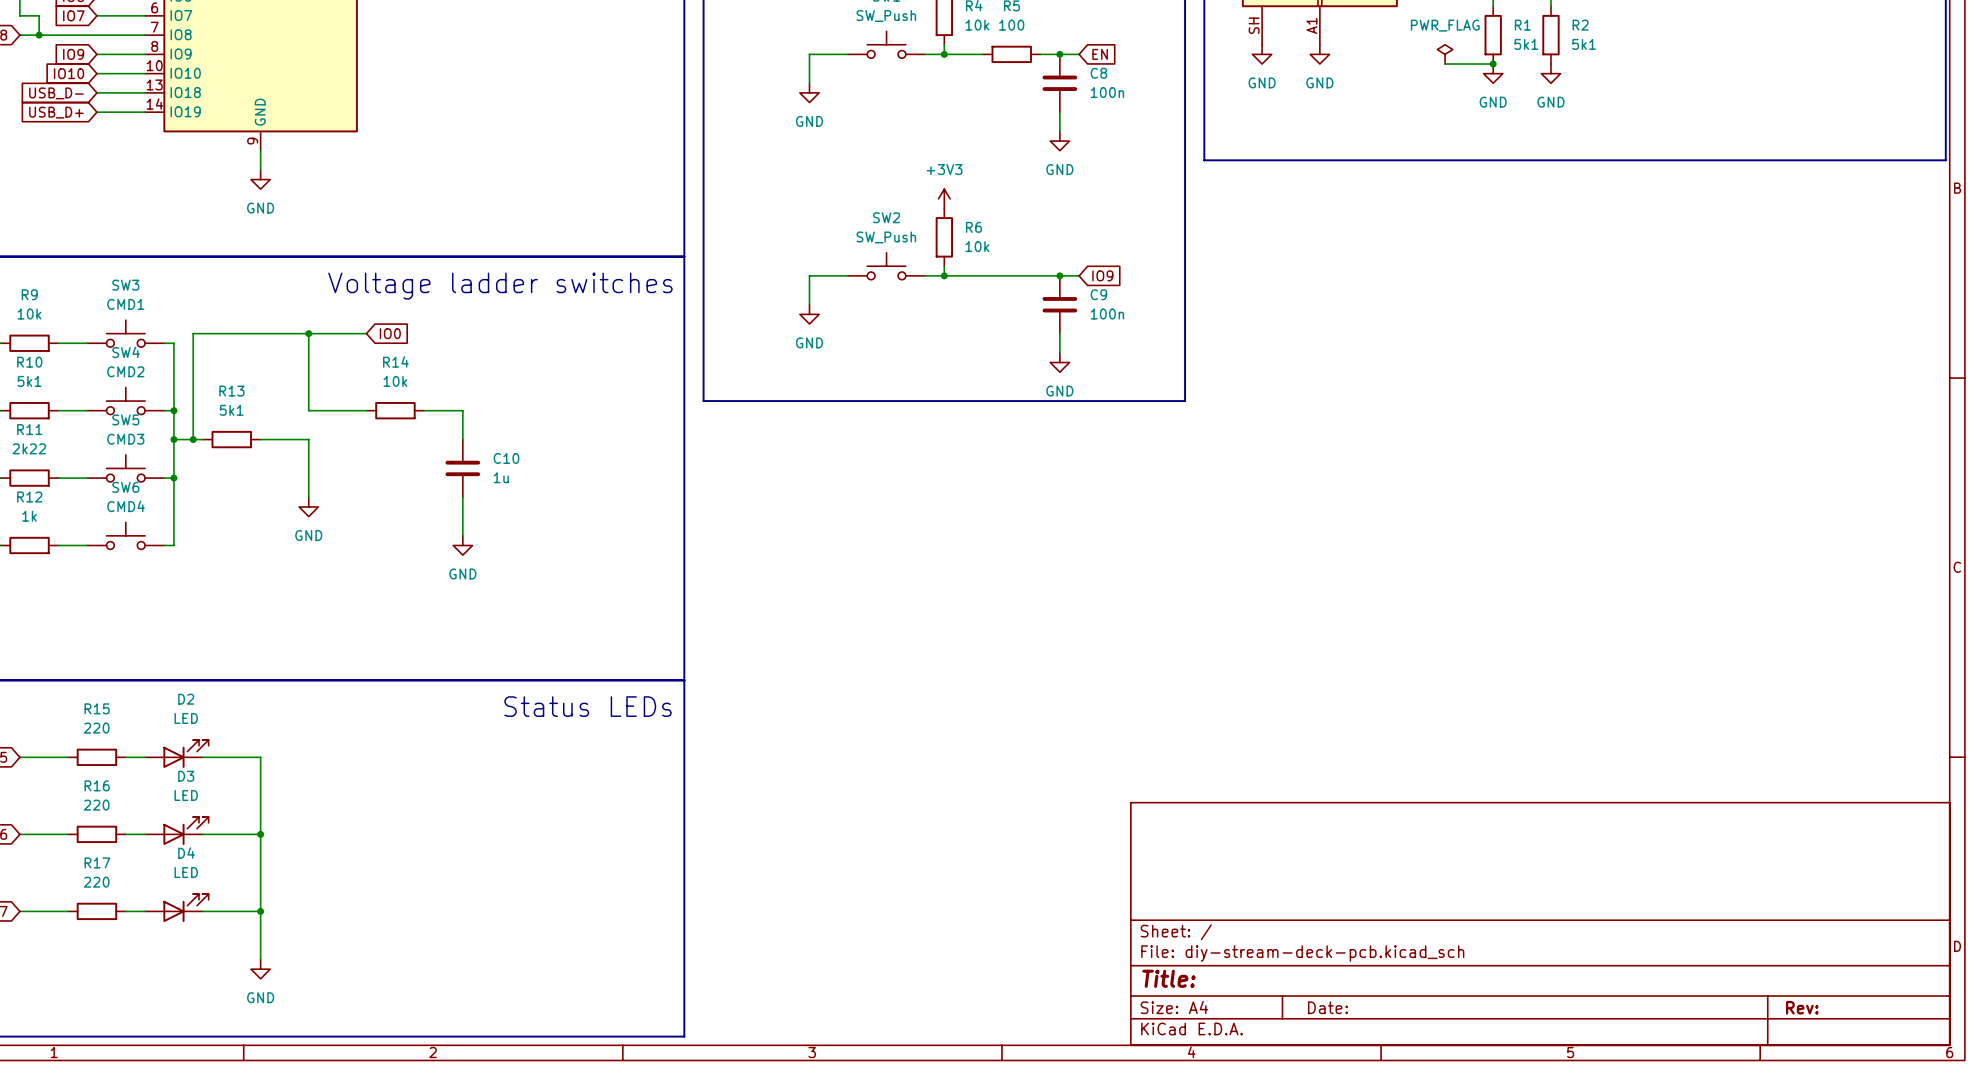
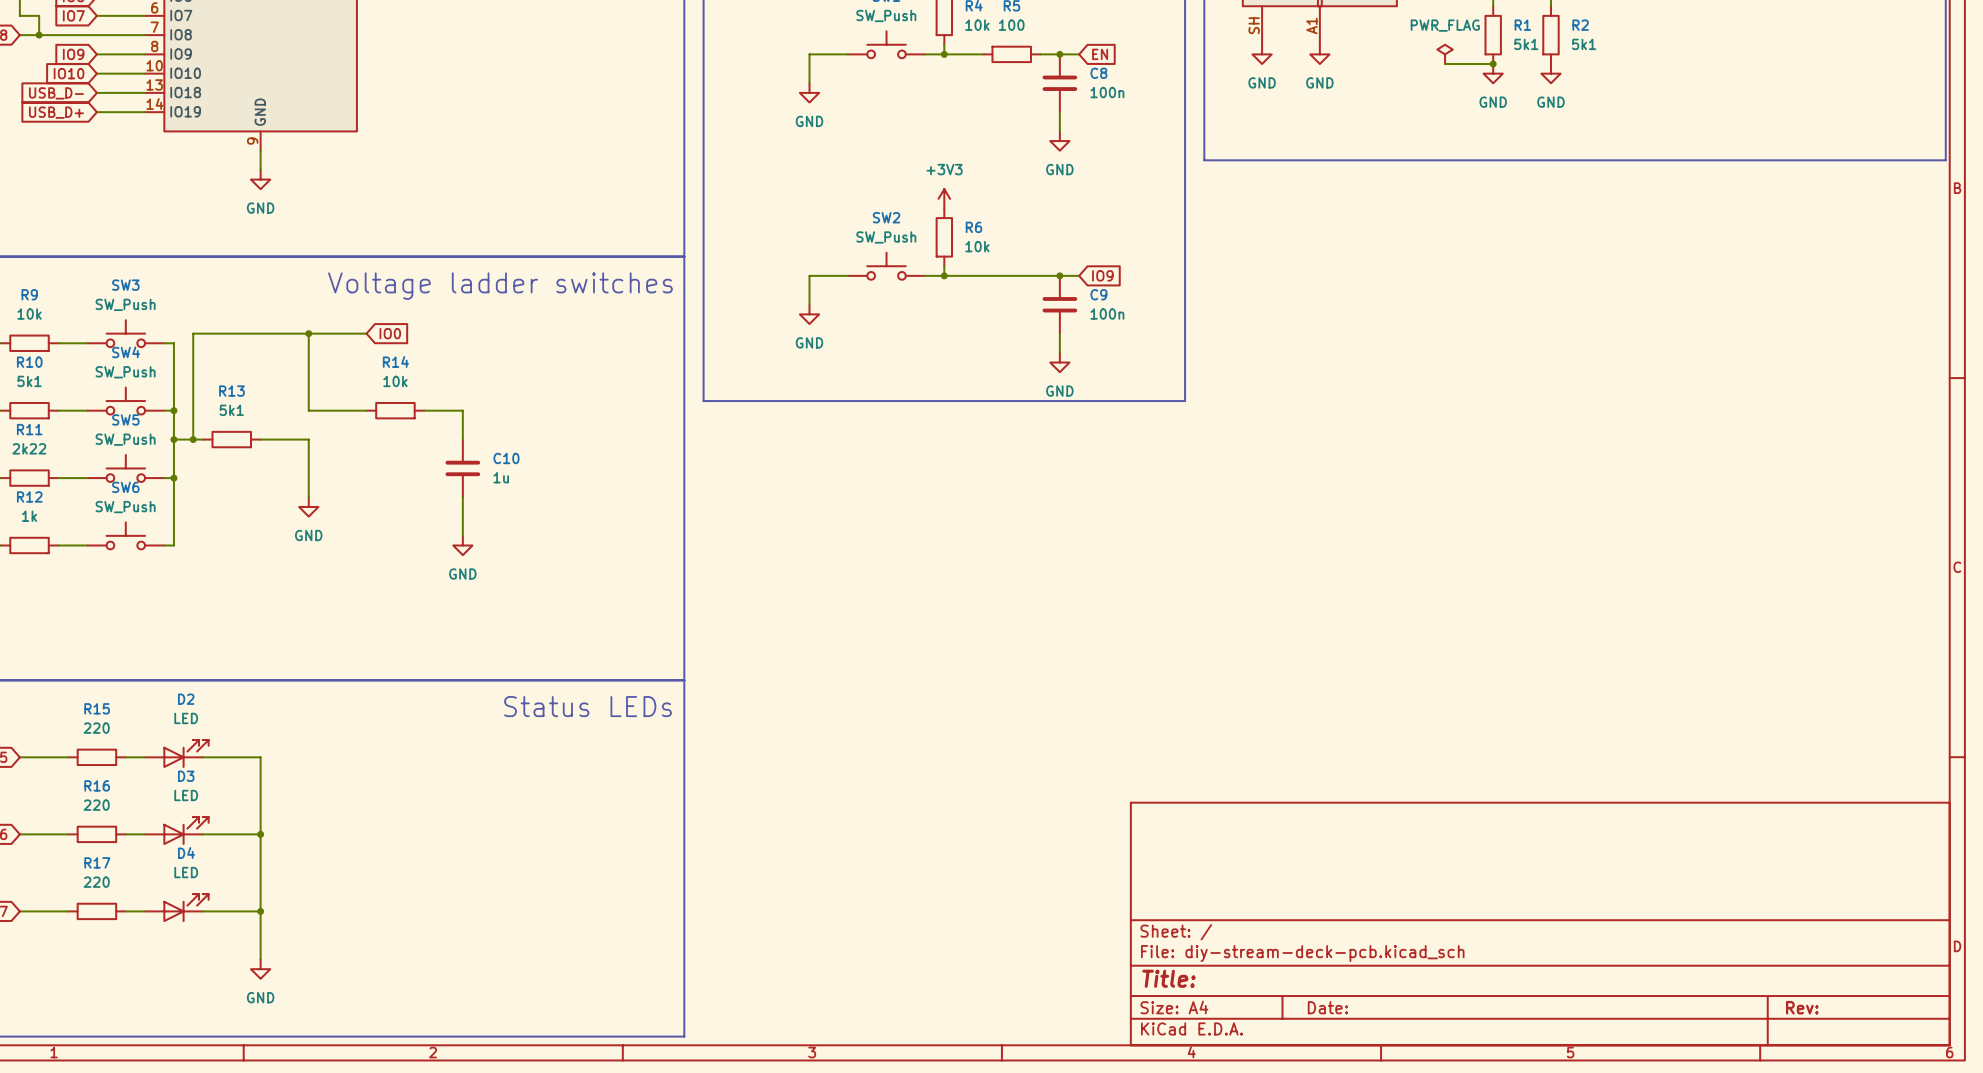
SW3 value: CMD1 (125, 304) -> SW_Push (125, 304)
SW4 value: CMD2 (125, 371) -> SW_Push (125, 372)
SW5 value: CMD3 (125, 439) -> SW_Push (125, 439)
SW6 value: CMD4 (126, 506) -> SW_Push (125, 507)

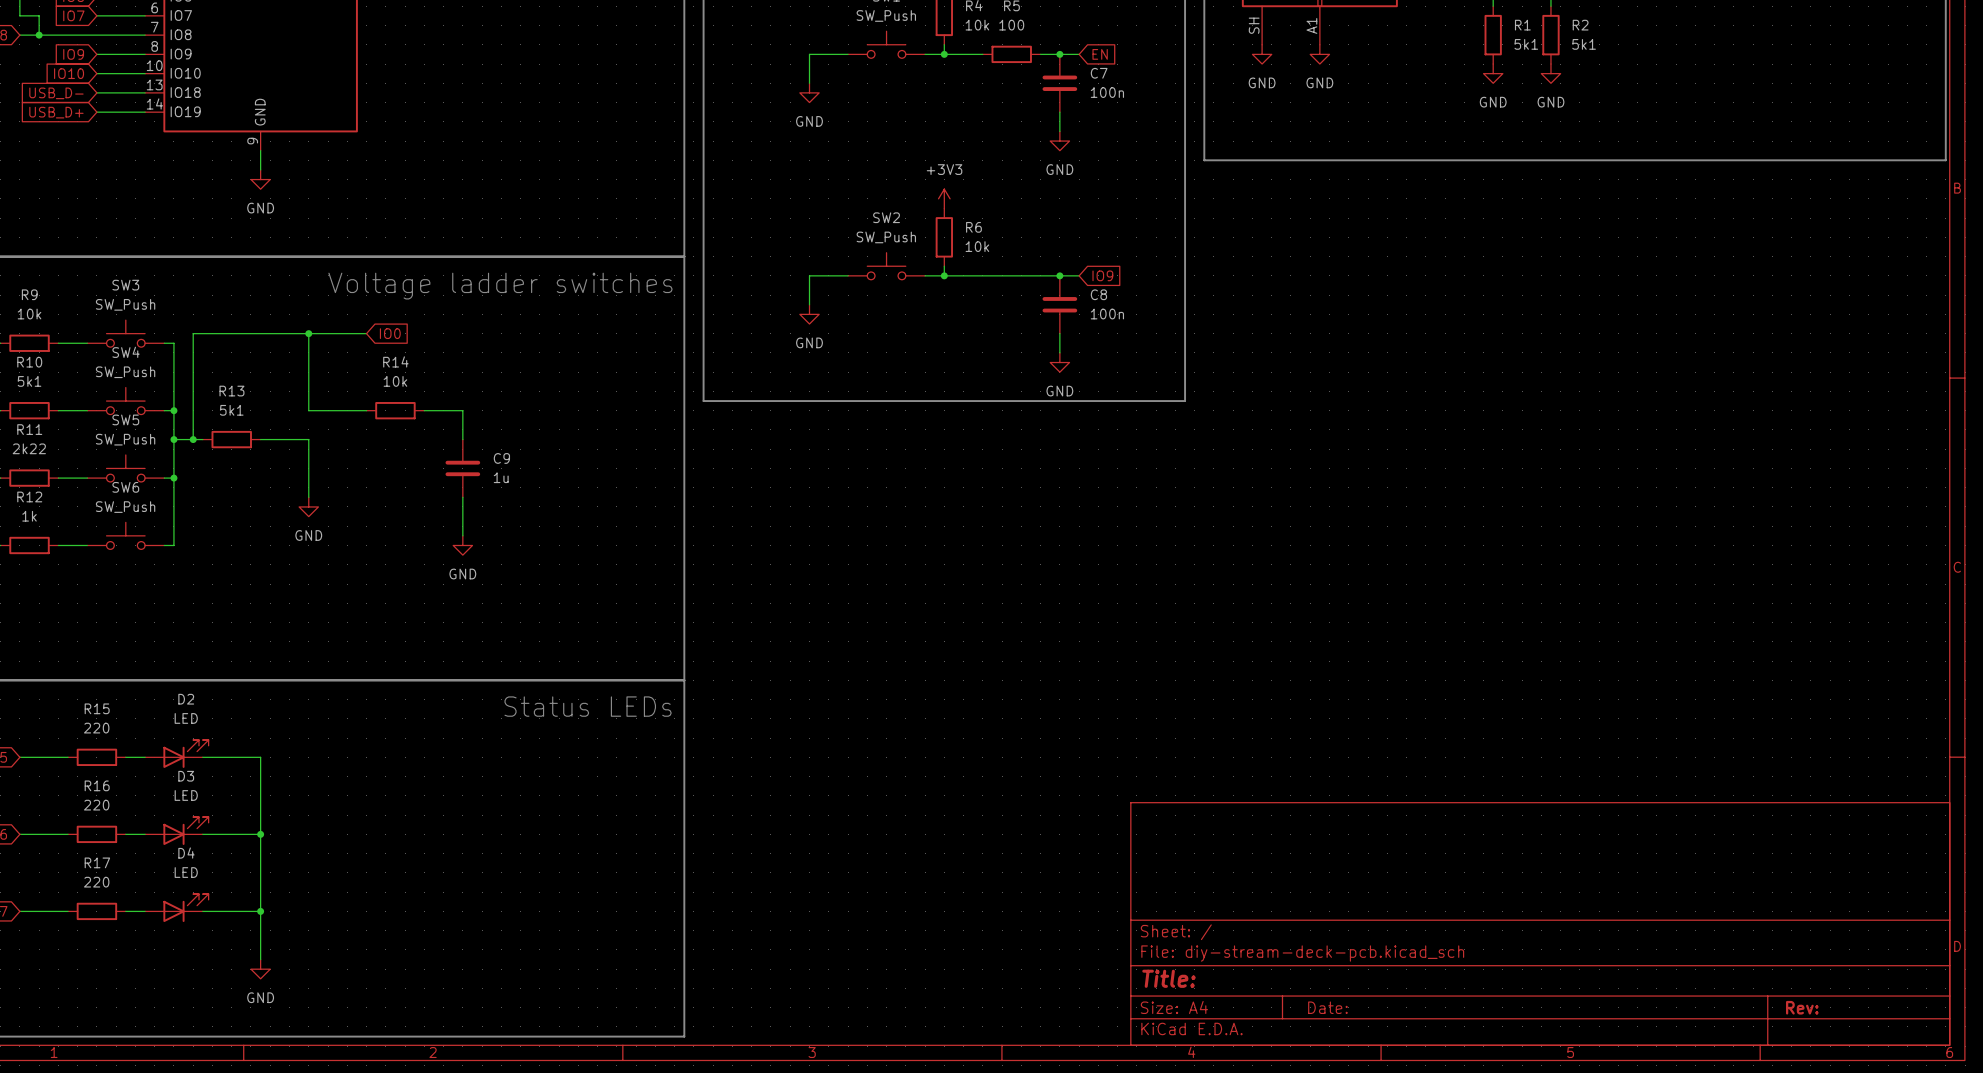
power symbol: PWR_FLAG (1445, 54) -> none
wire: (1445, 64) (1493, 64) -> none
junction: (1493, 64) -> none
C8 name: C8 (1098, 73) -> C7 (1099, 73)
C9 name: C9 (1098, 294) -> C8 (1098, 294)
C10 name: C10 (506, 458) -> C9 (501, 458)

